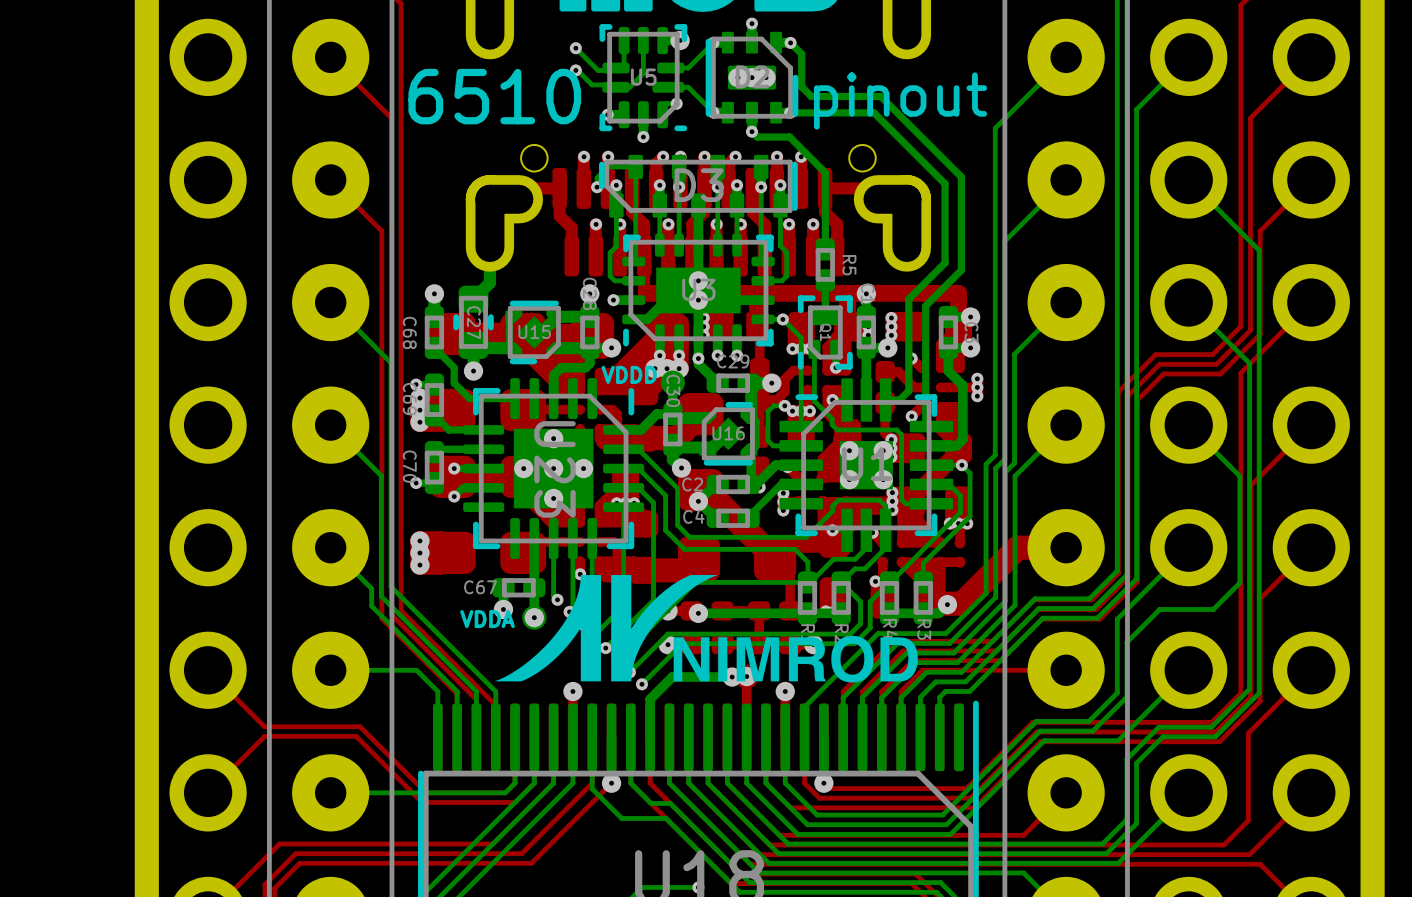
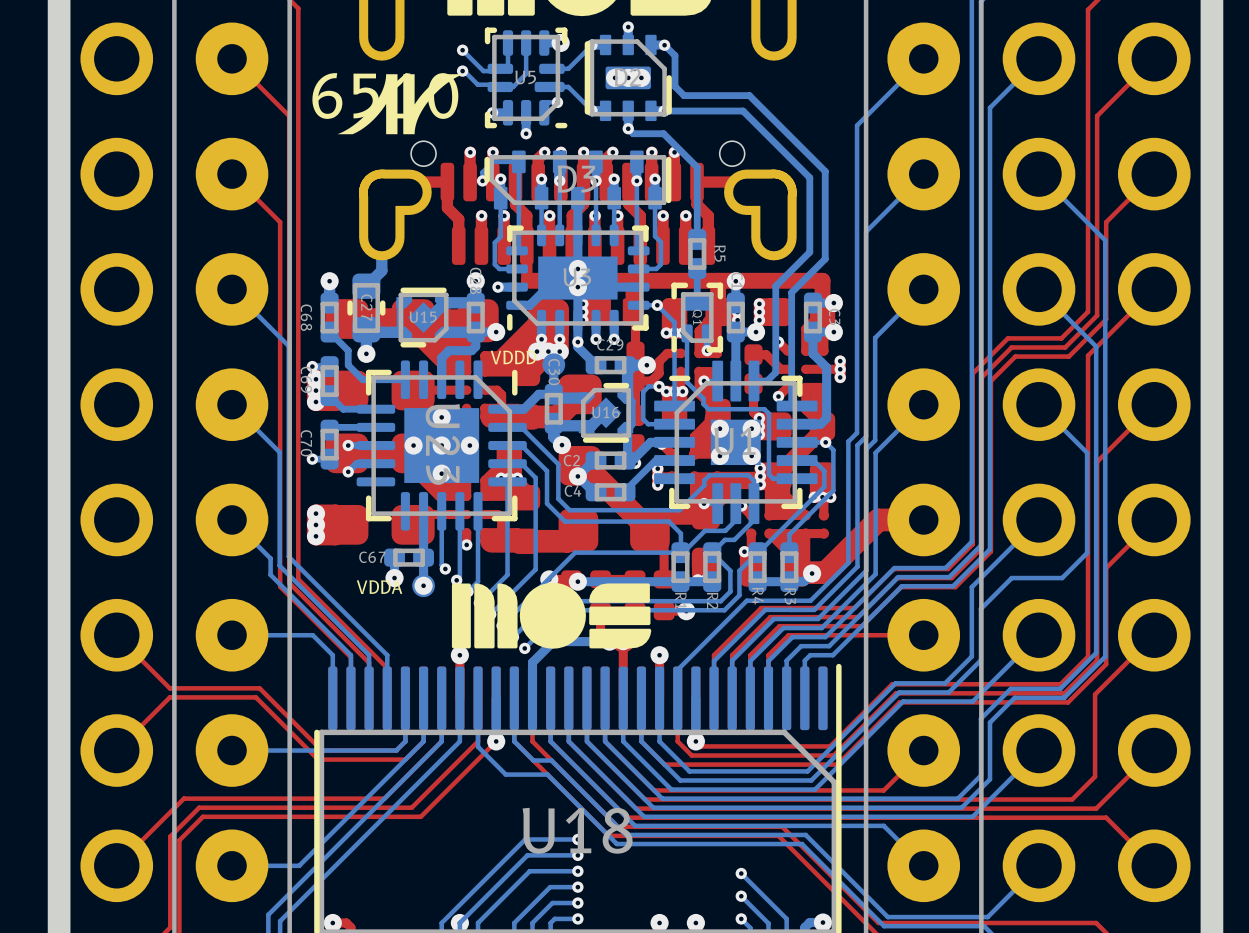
drawing: none -> [337, 74, 464, 135]
text: pinout (900, 100) -> none
drawing shape: [494, 575, 918, 683] -> [451, 582, 652, 649]

